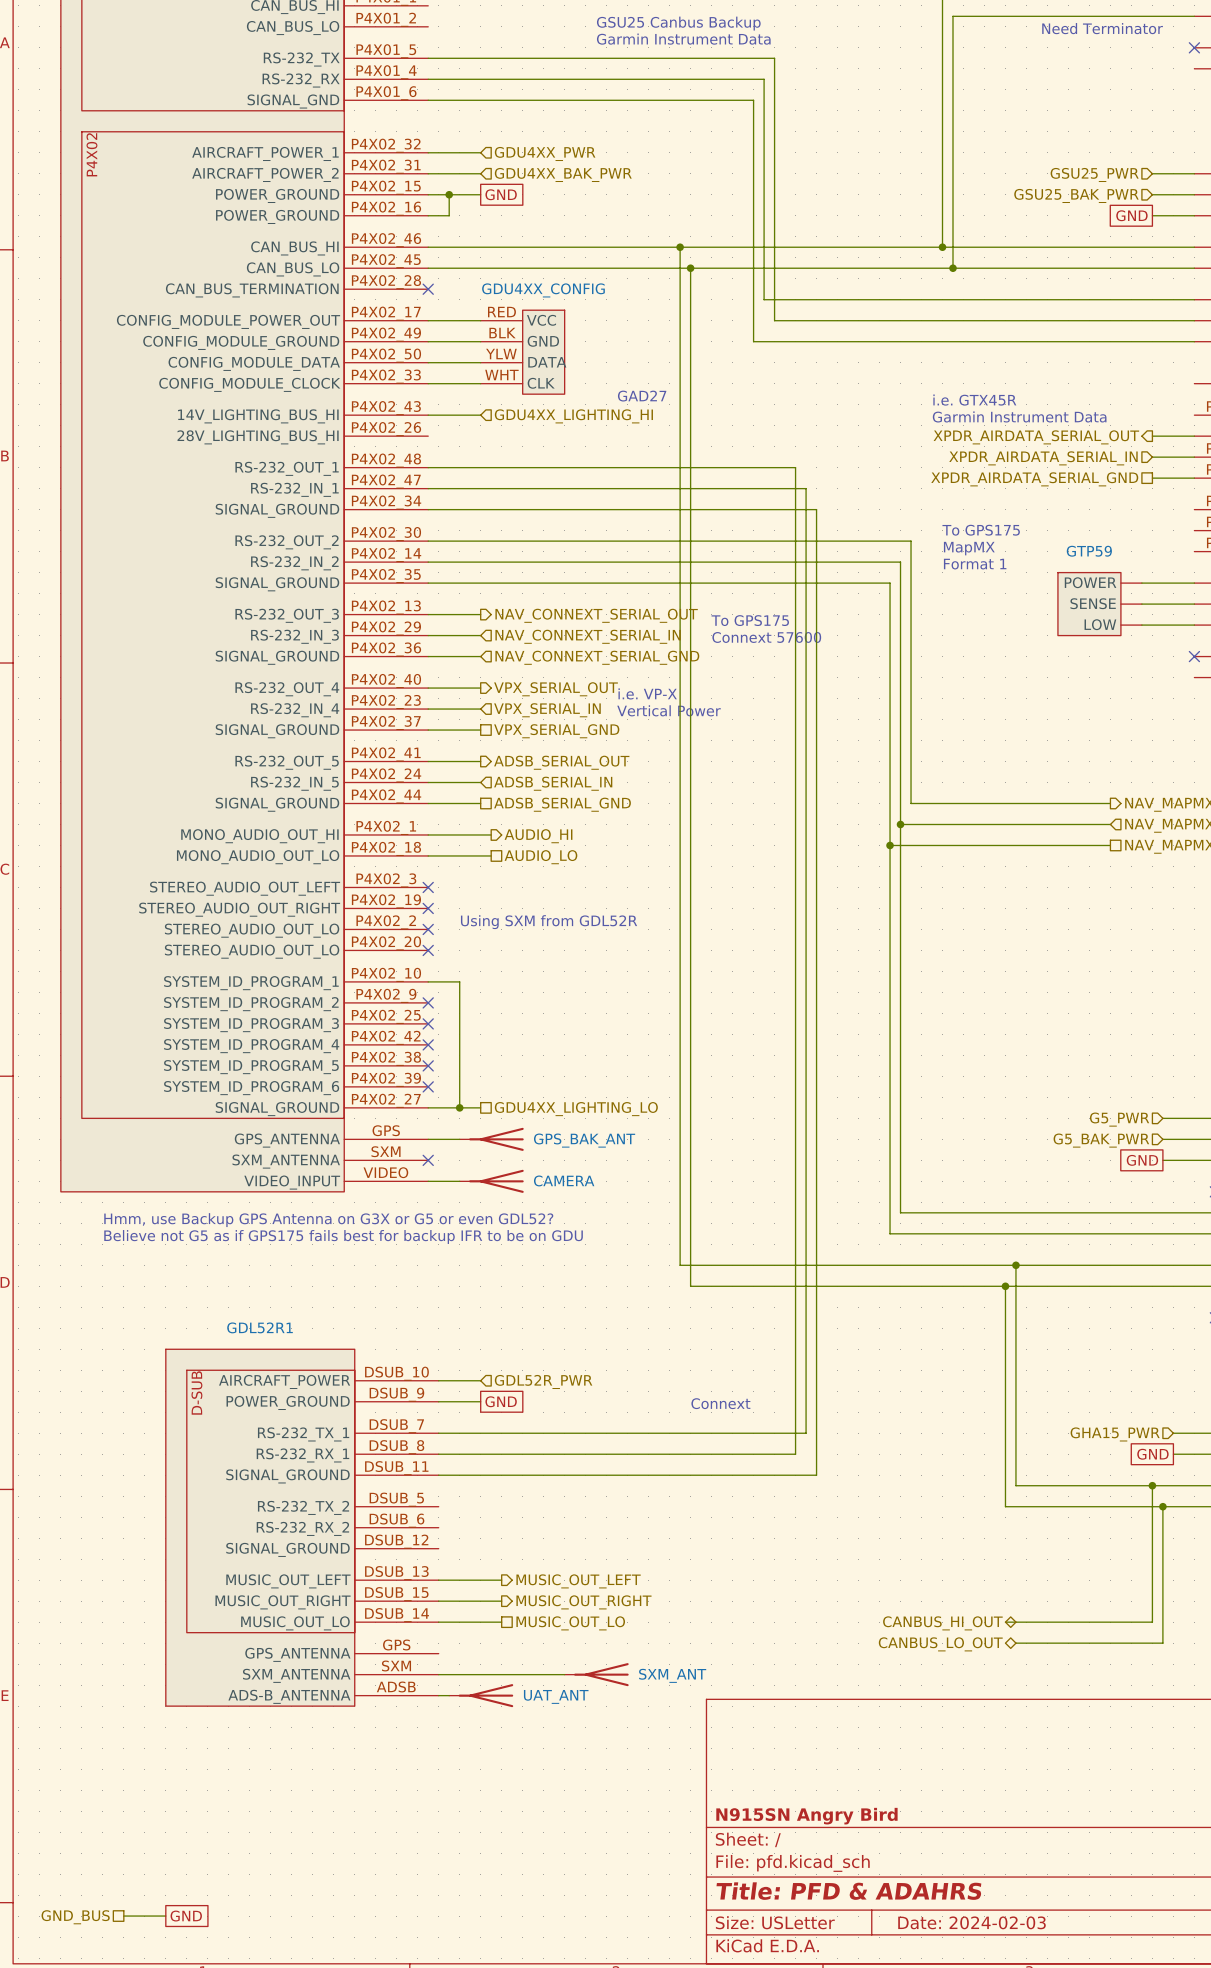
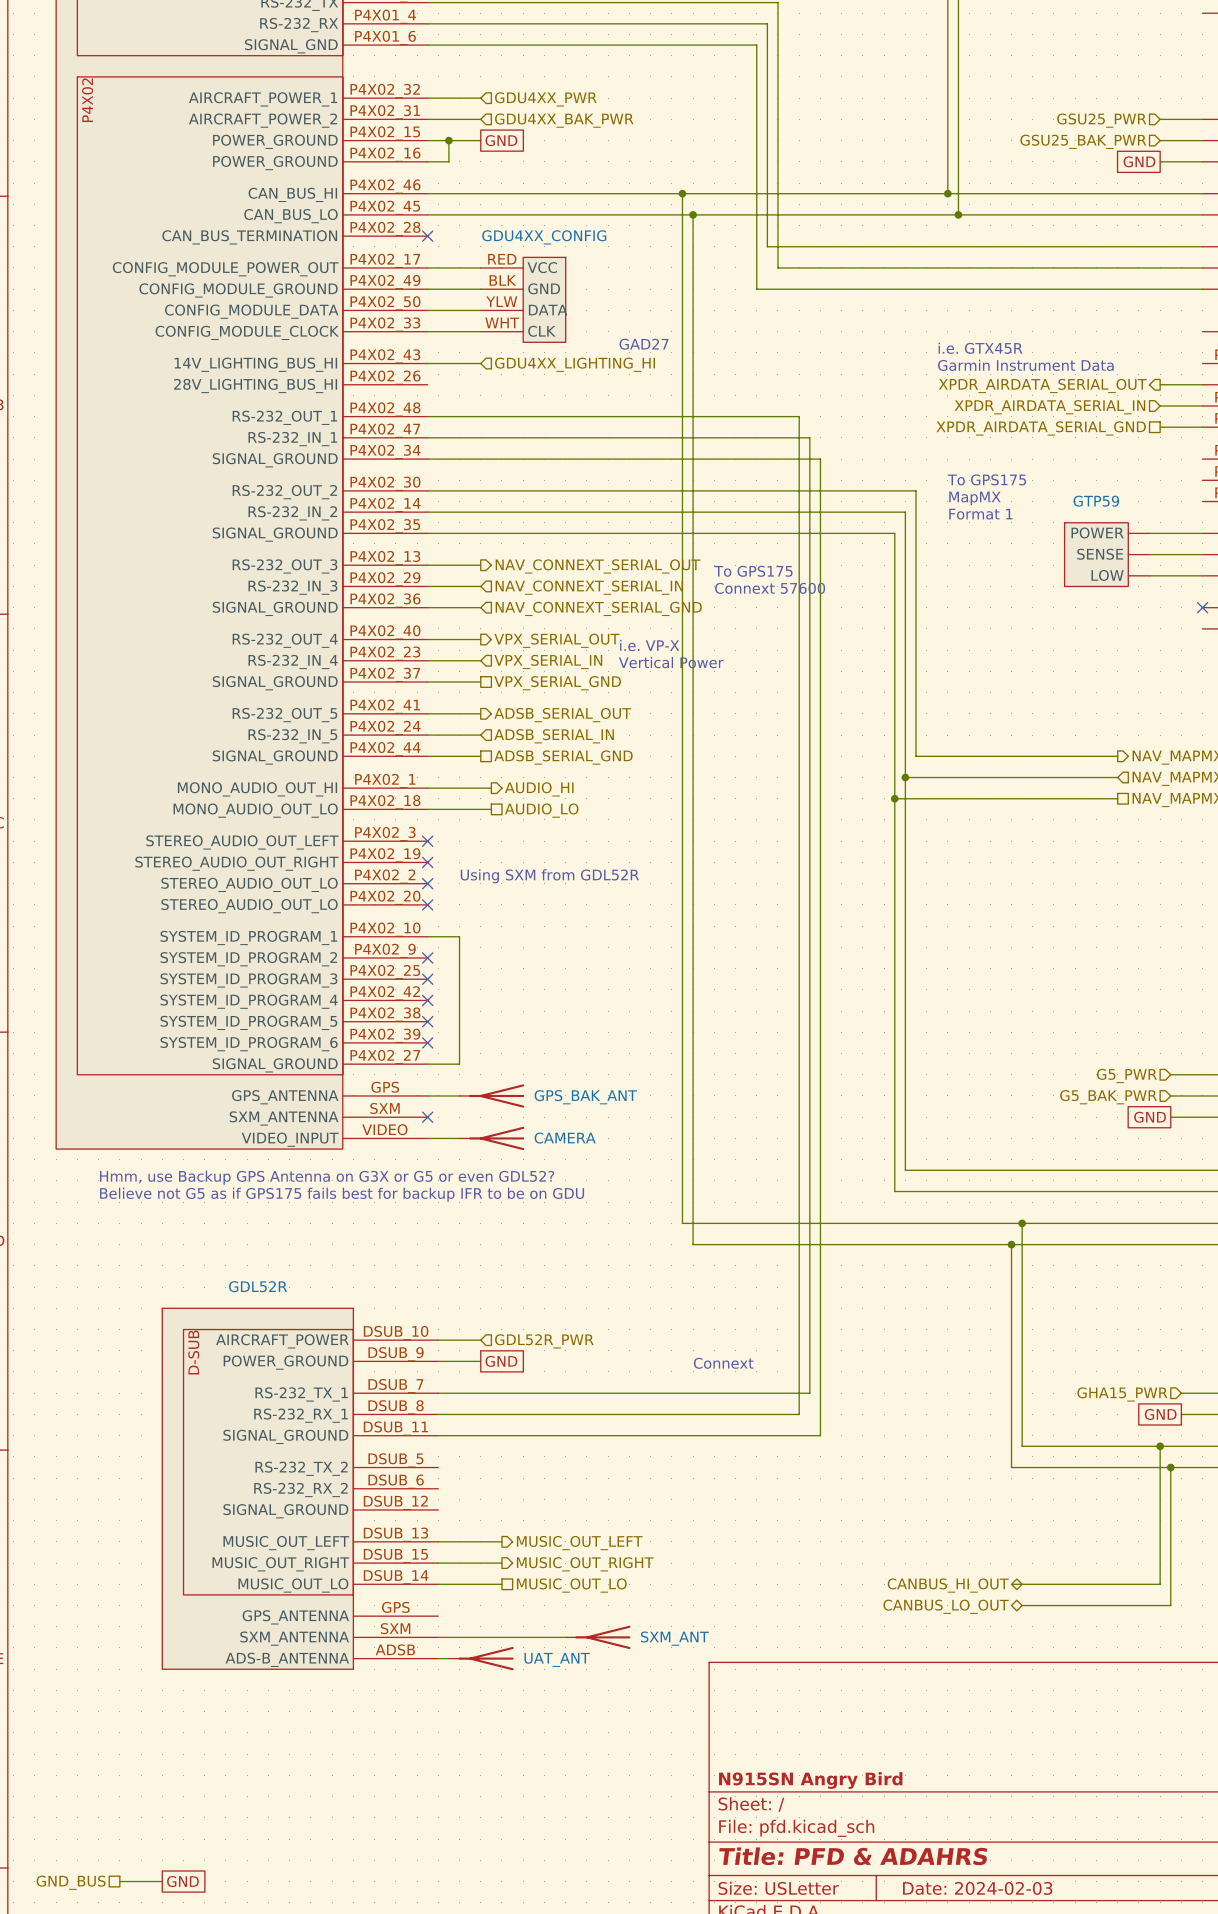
wire: (459, 1107) (480, 1107) -> none
junction: (459, 1107) -> none
hierarchical label: GDU4XX_LIGHTING_LO (576, 1109) -> none
GDL52R1 name: GDL52R1 (260, 1327) -> GDL52R (258, 1286)

